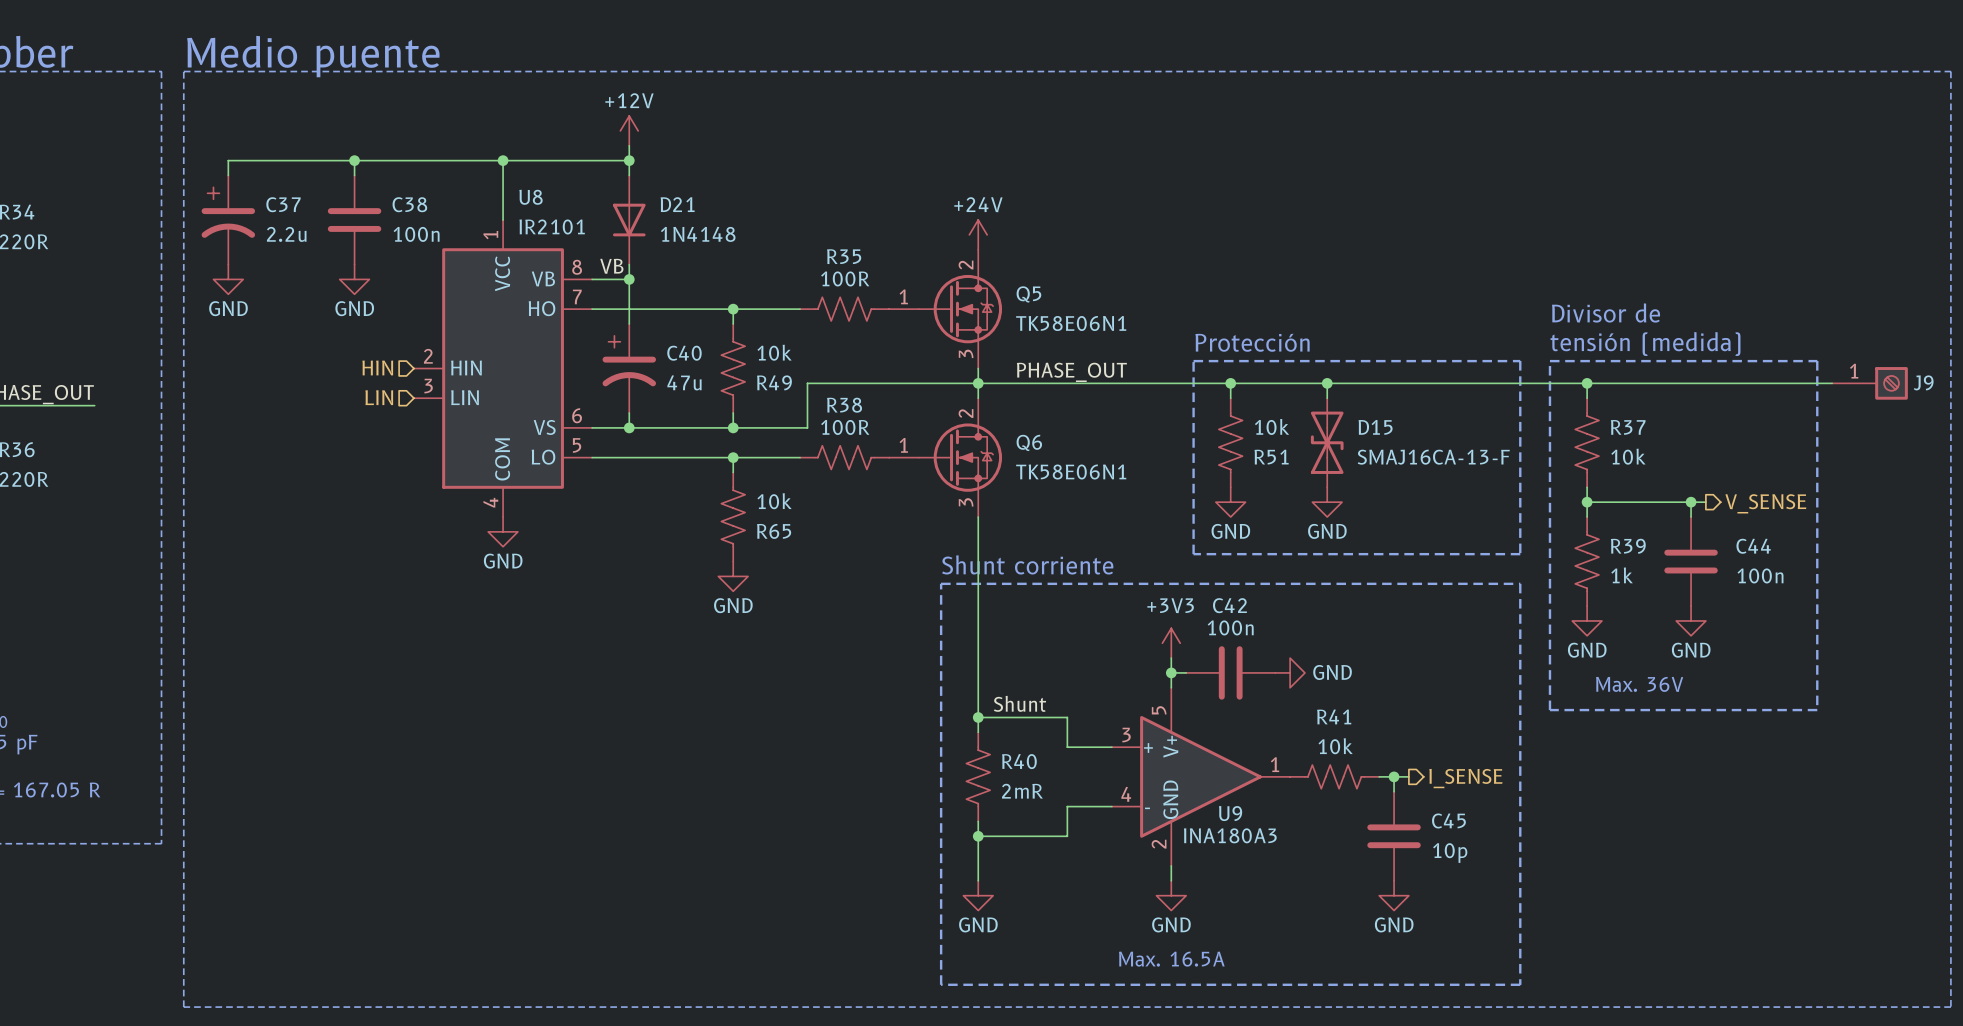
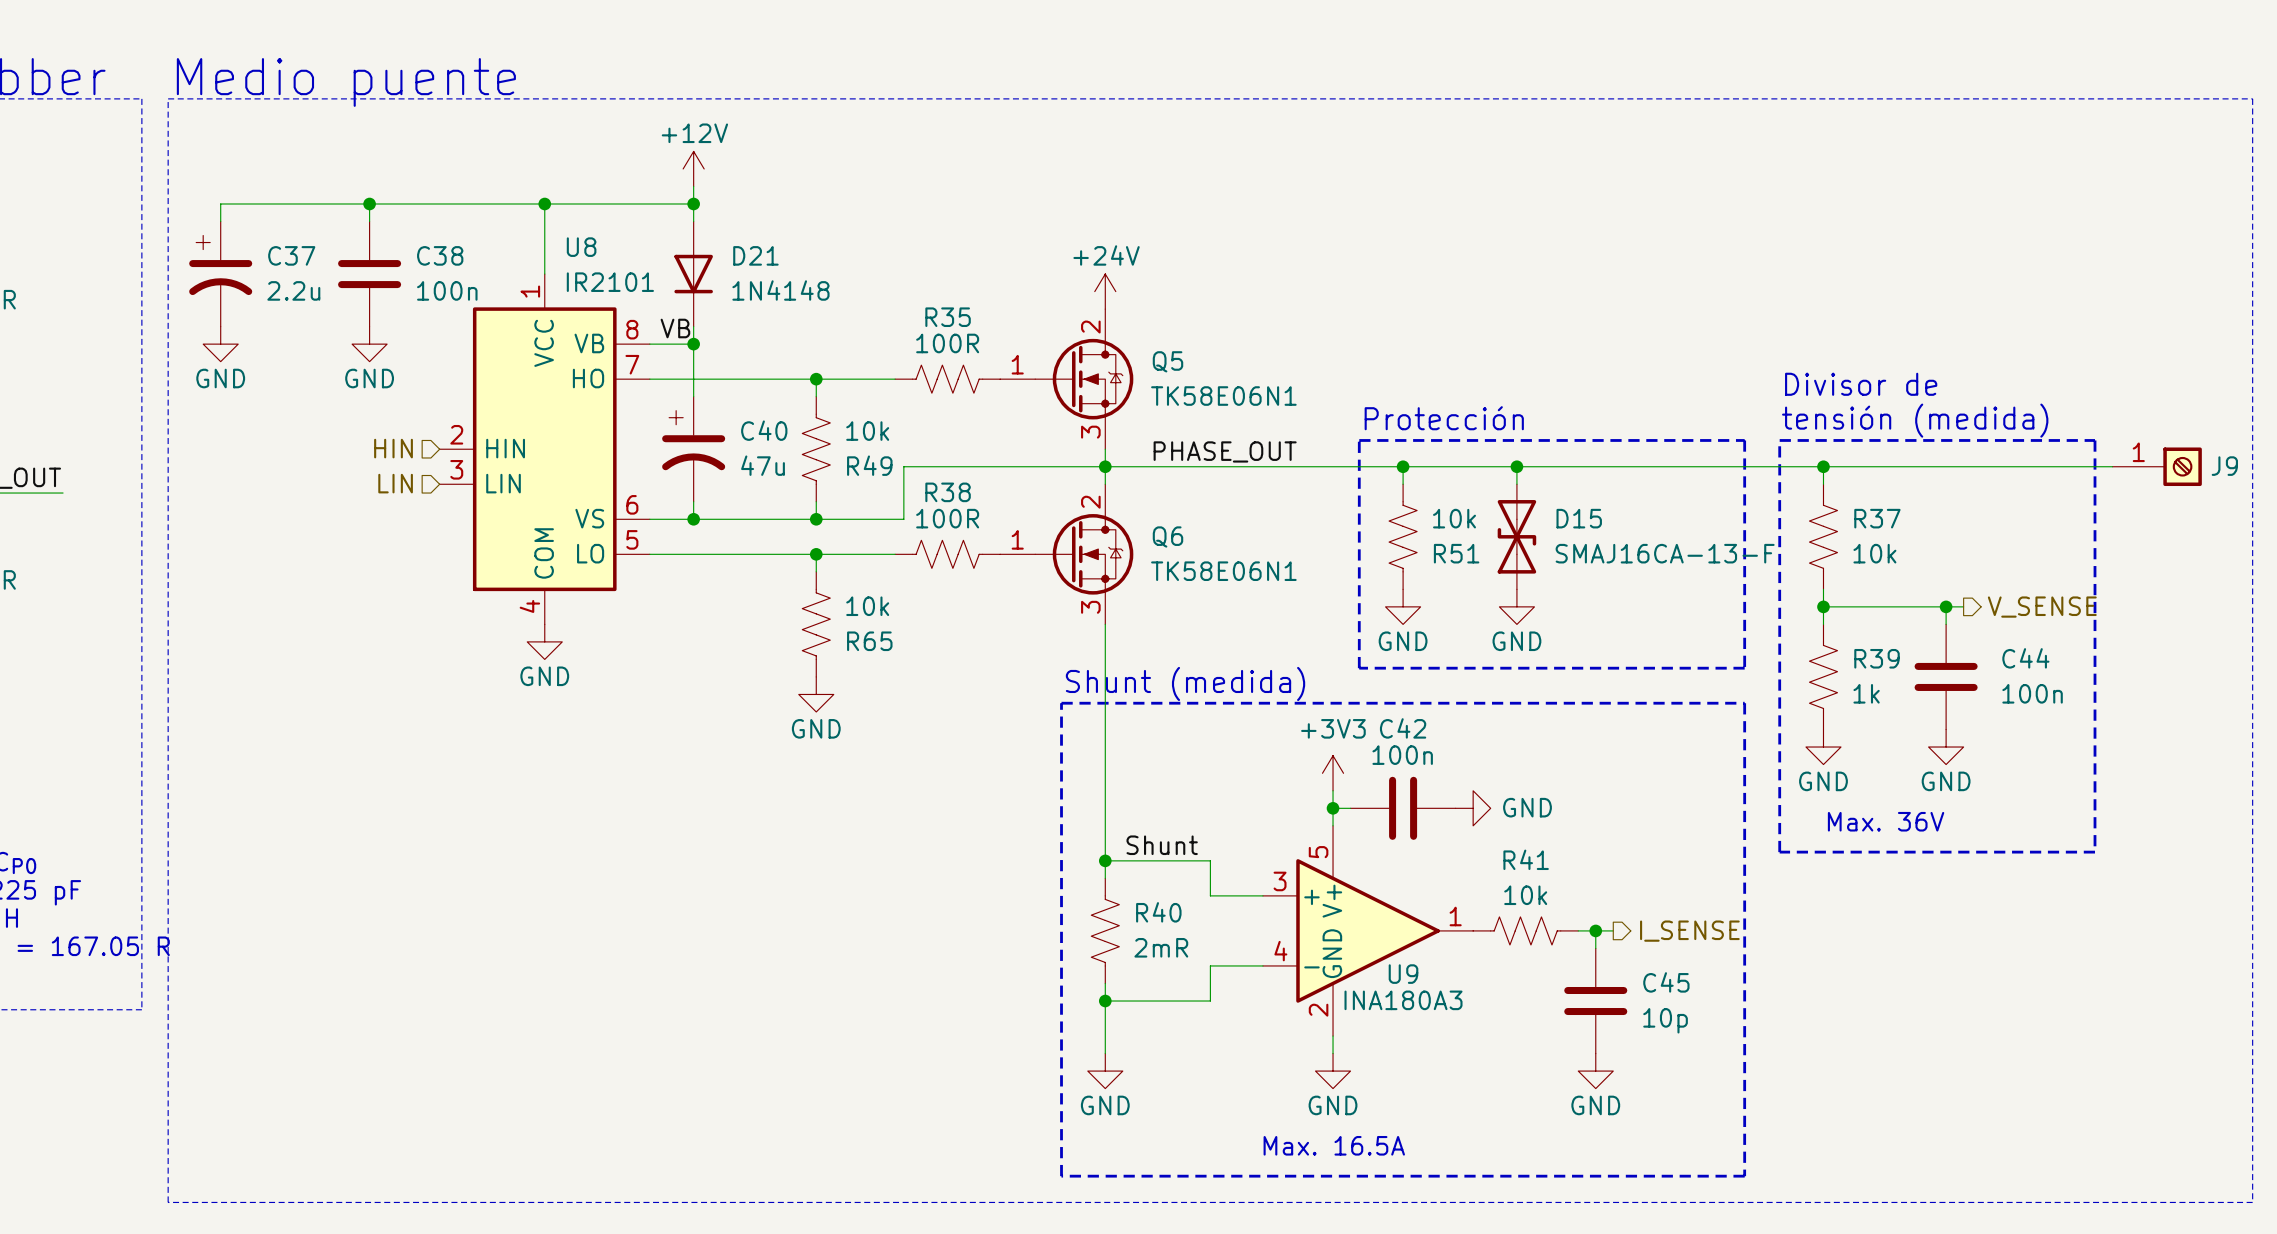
text: Shunt corriente (1027, 564) -> Shunt (medida) (1185, 683)

